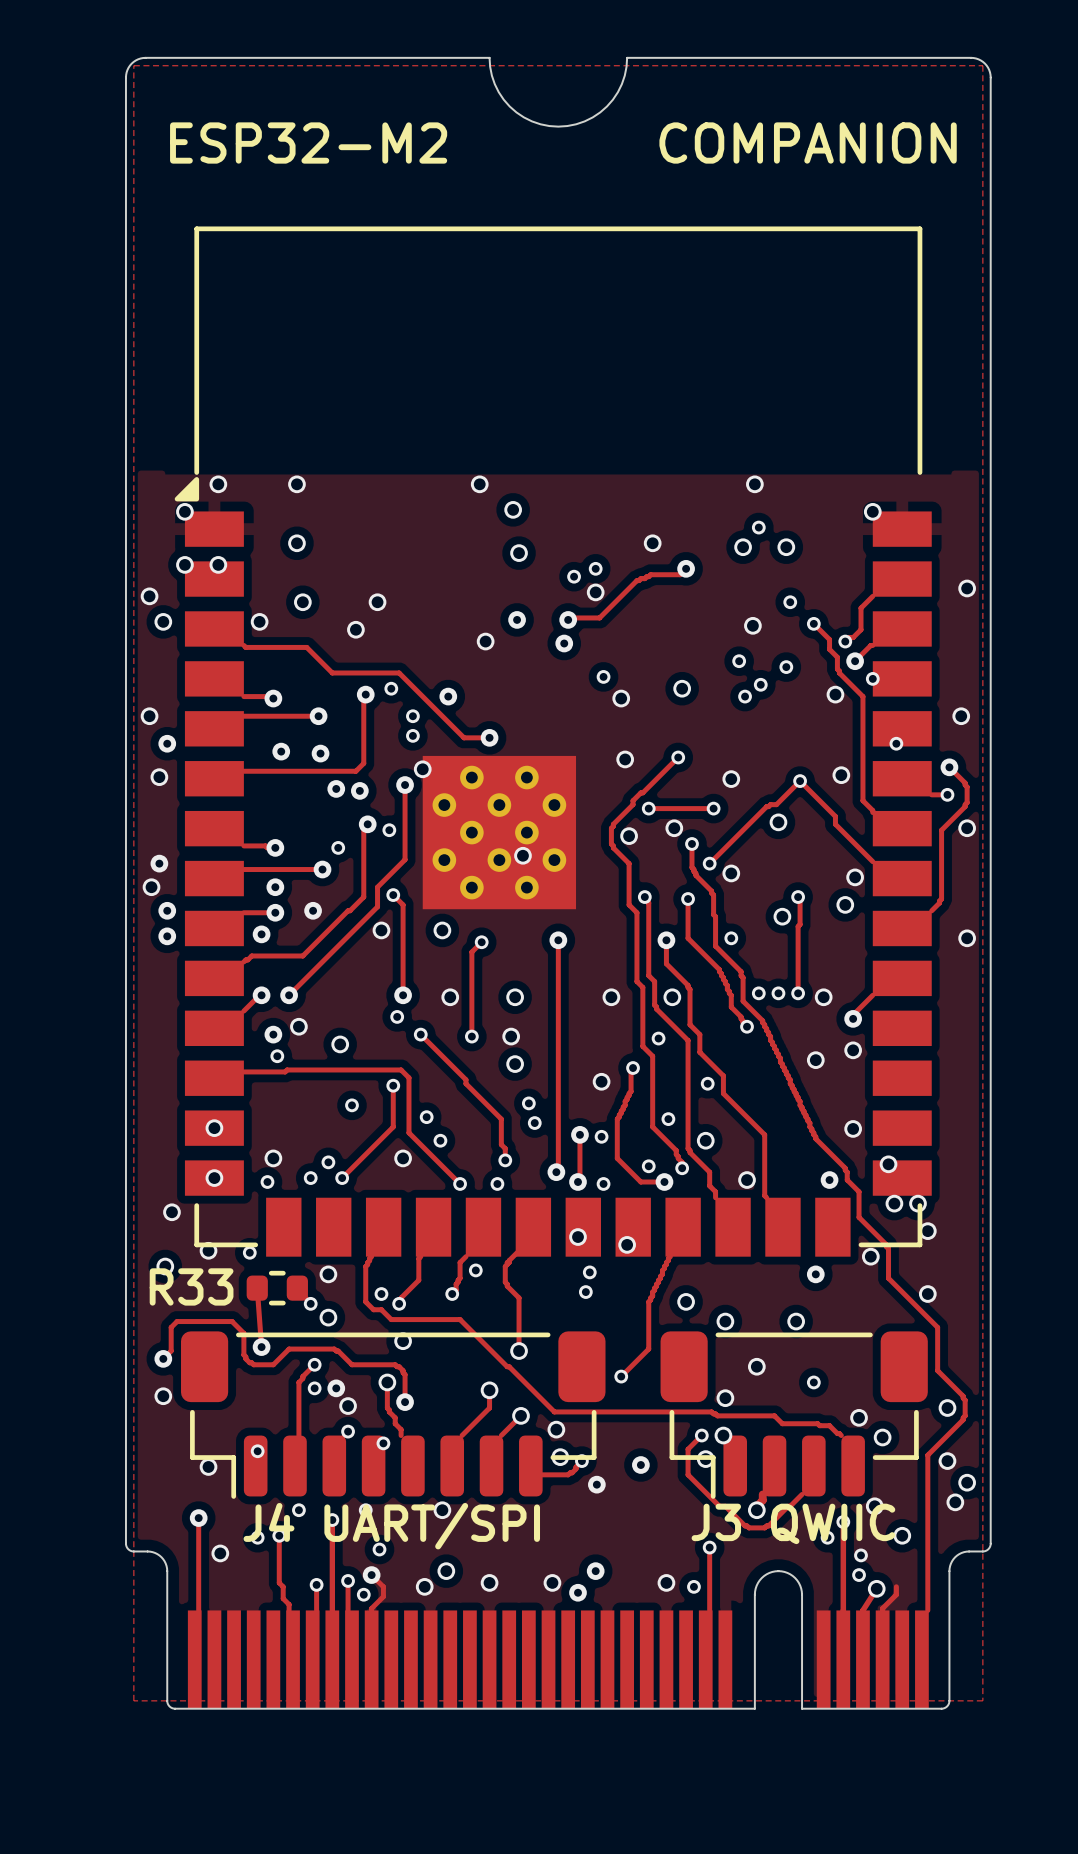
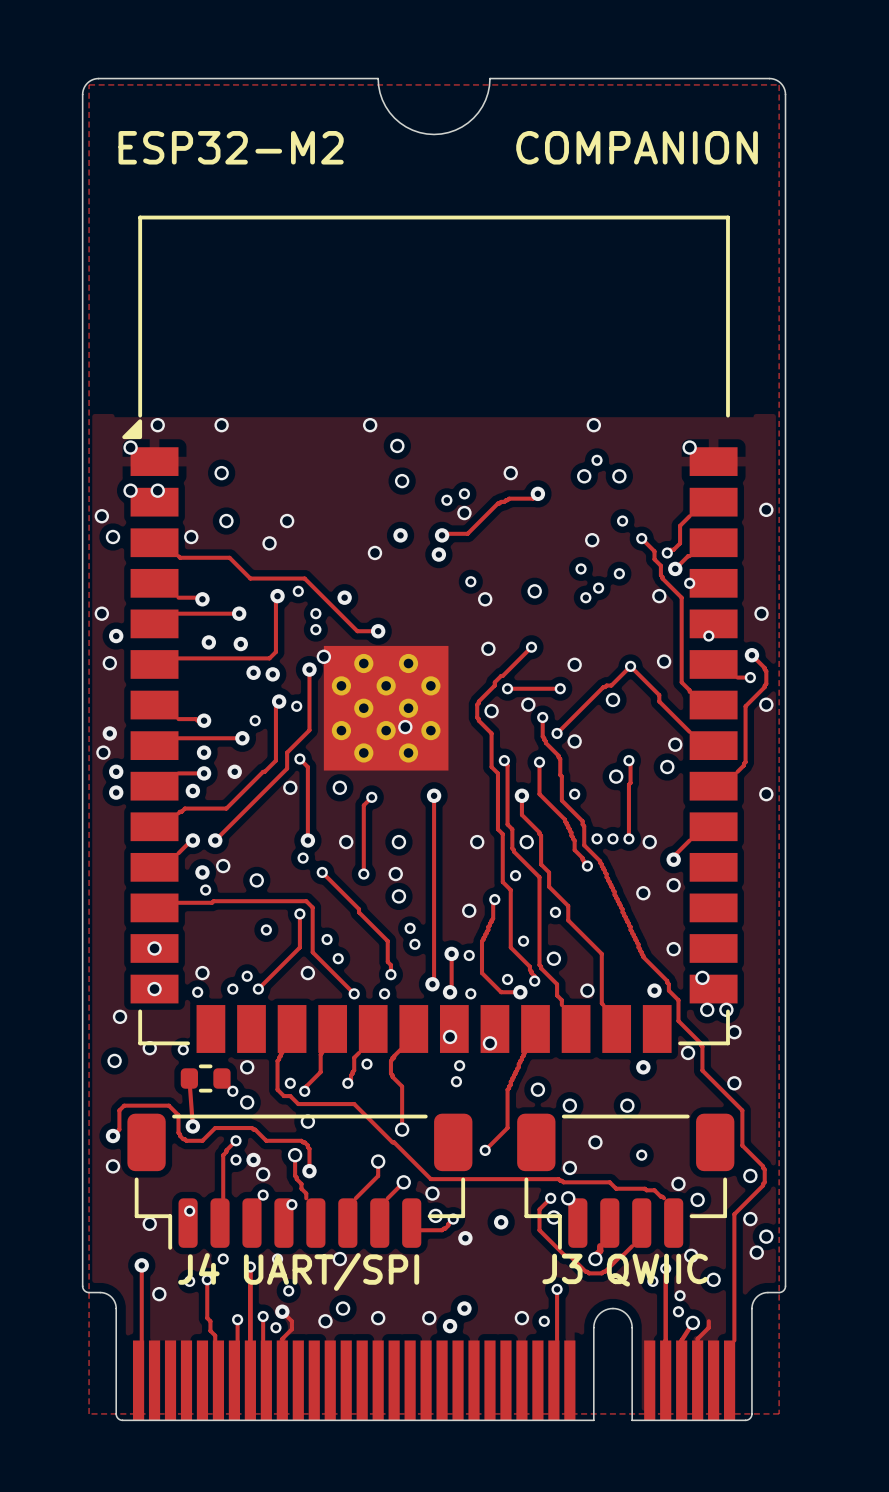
R33 name: R33 (191, 1286) -> none

